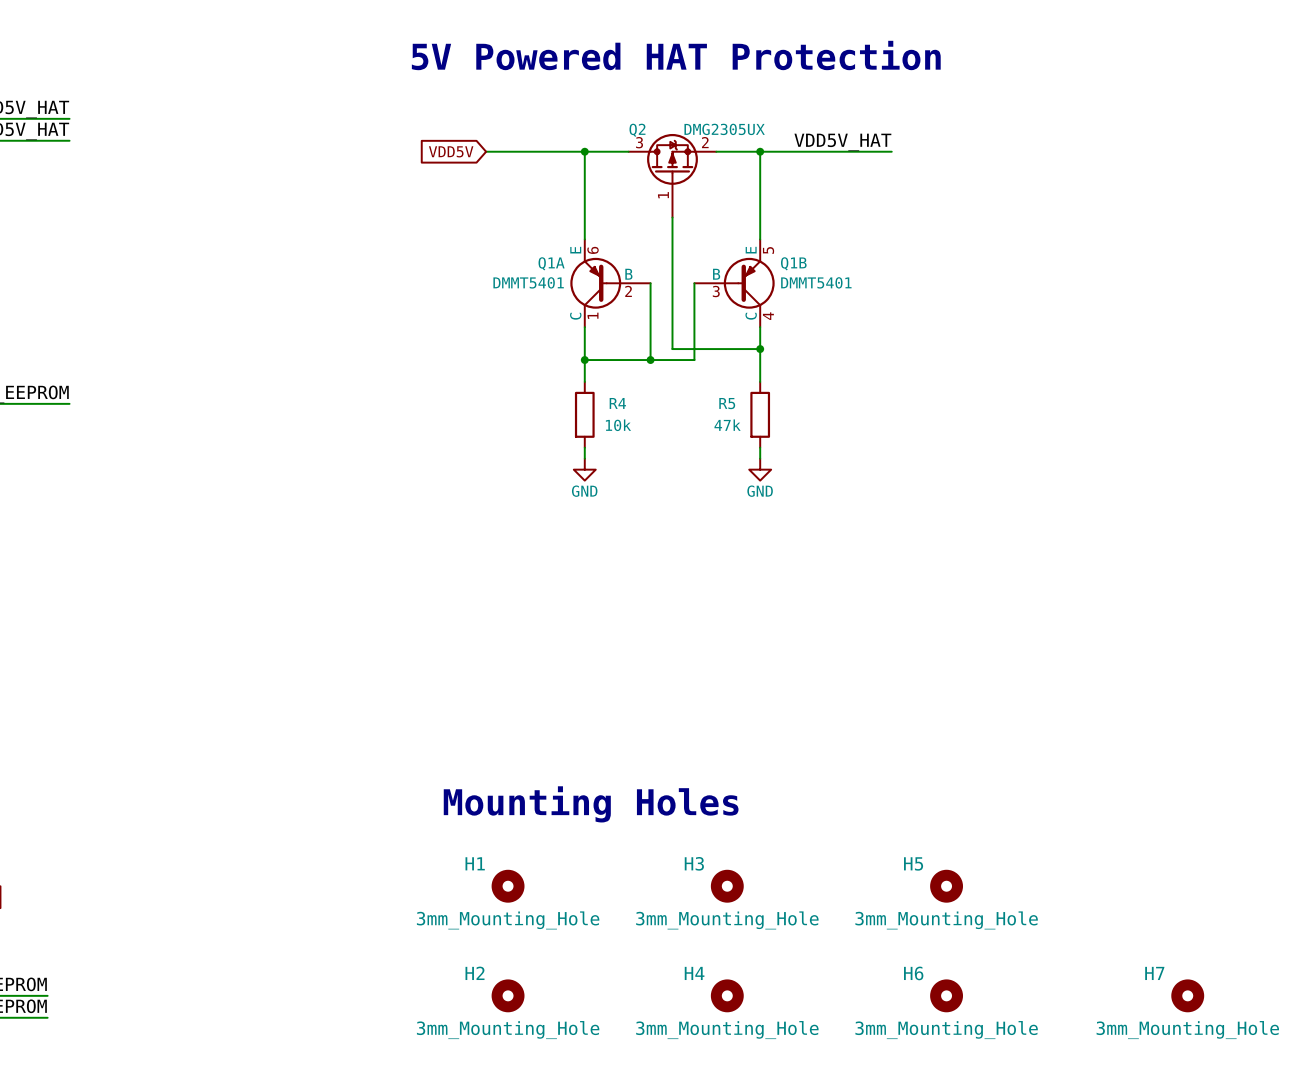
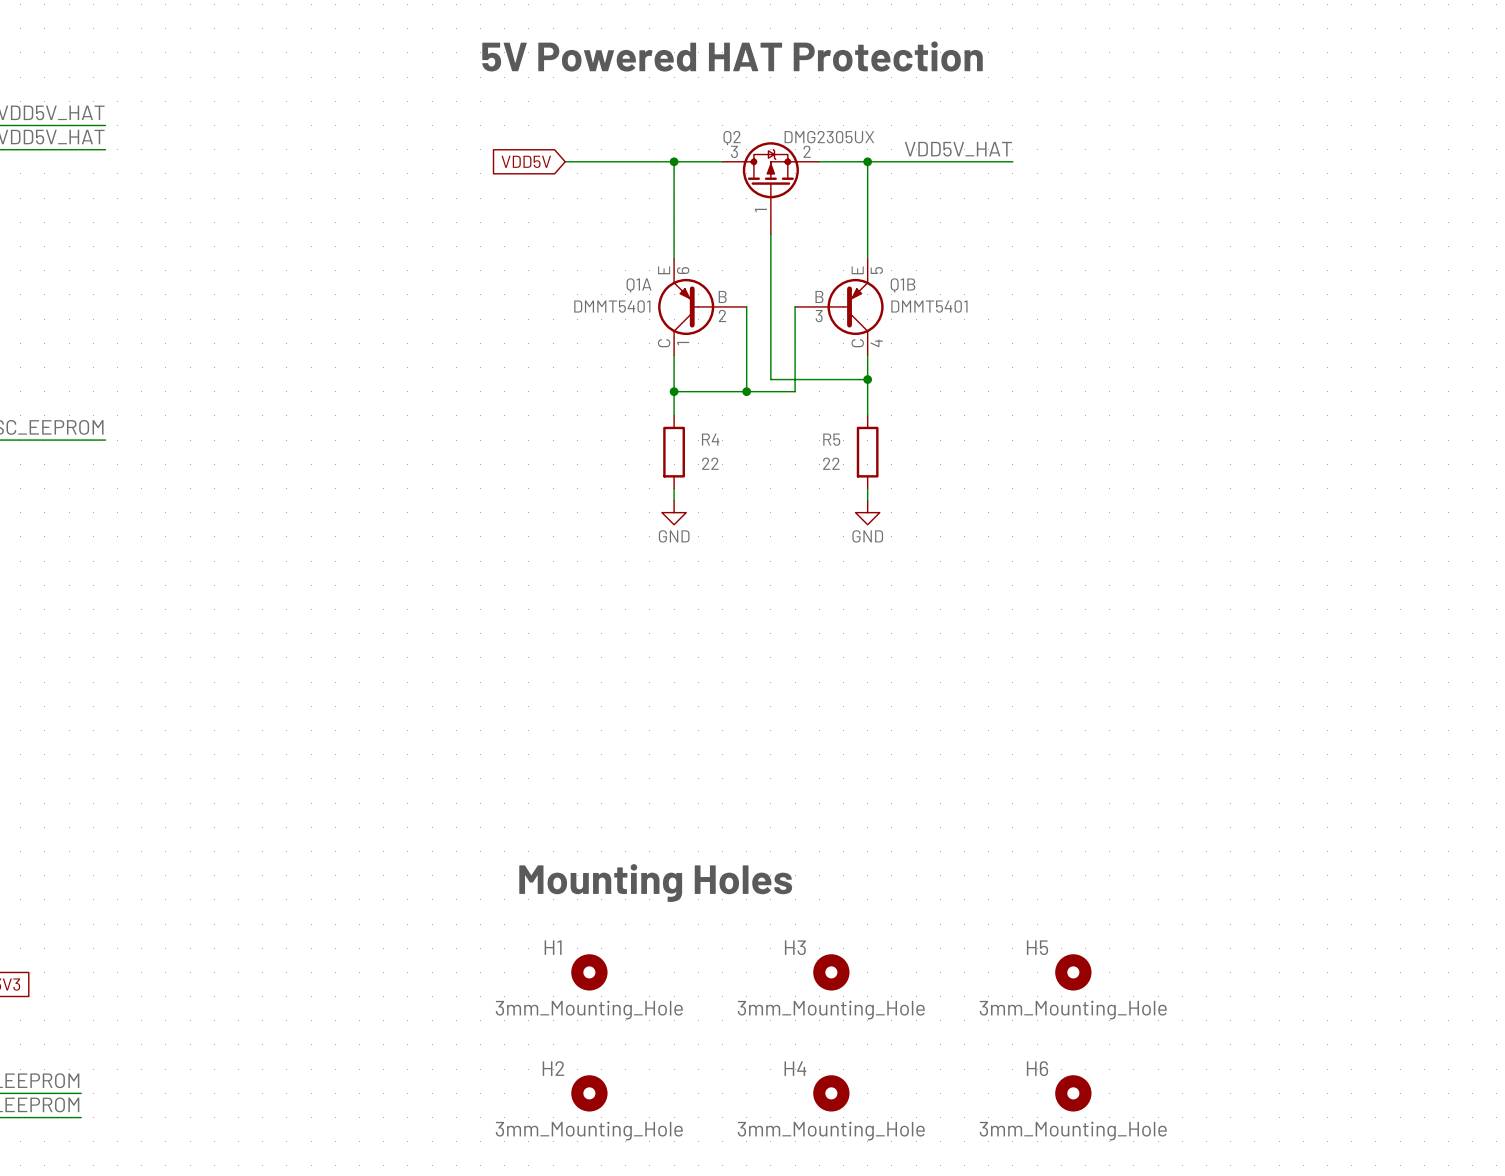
R4 value: 10k (618, 425) -> 22 (710, 463)
R5 value: 47k (727, 425) -> 22 (831, 463)
H7: 3mm_Mounting_Hole (1187, 995) -> none

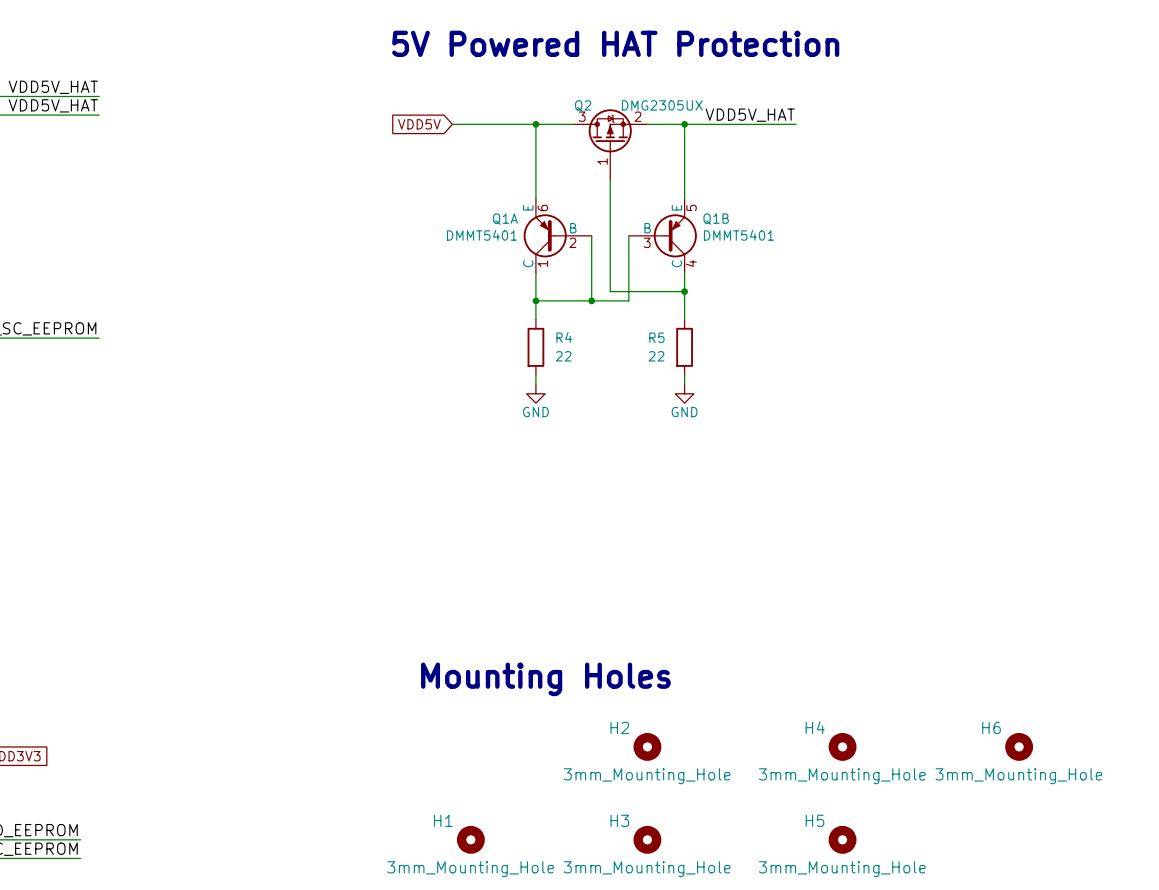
H5 name: H5 (1037, 947) -> H4 (815, 727)
H1: 3mm_Mounting_Hole (589, 972) -> none
H2: none -> 3mm_Mounting_Hole (647, 746)
H3 position: (831, 972) -> (647, 839)
H6: none -> 3mm_Mounting_Hole (1019, 746)
H2 name: H2 (553, 1068) -> H1 (443, 820)
H6 name: H6 (1037, 1068) -> H5 (814, 820)
H4: 3mm_Mounting_Hole (831, 1093) -> none

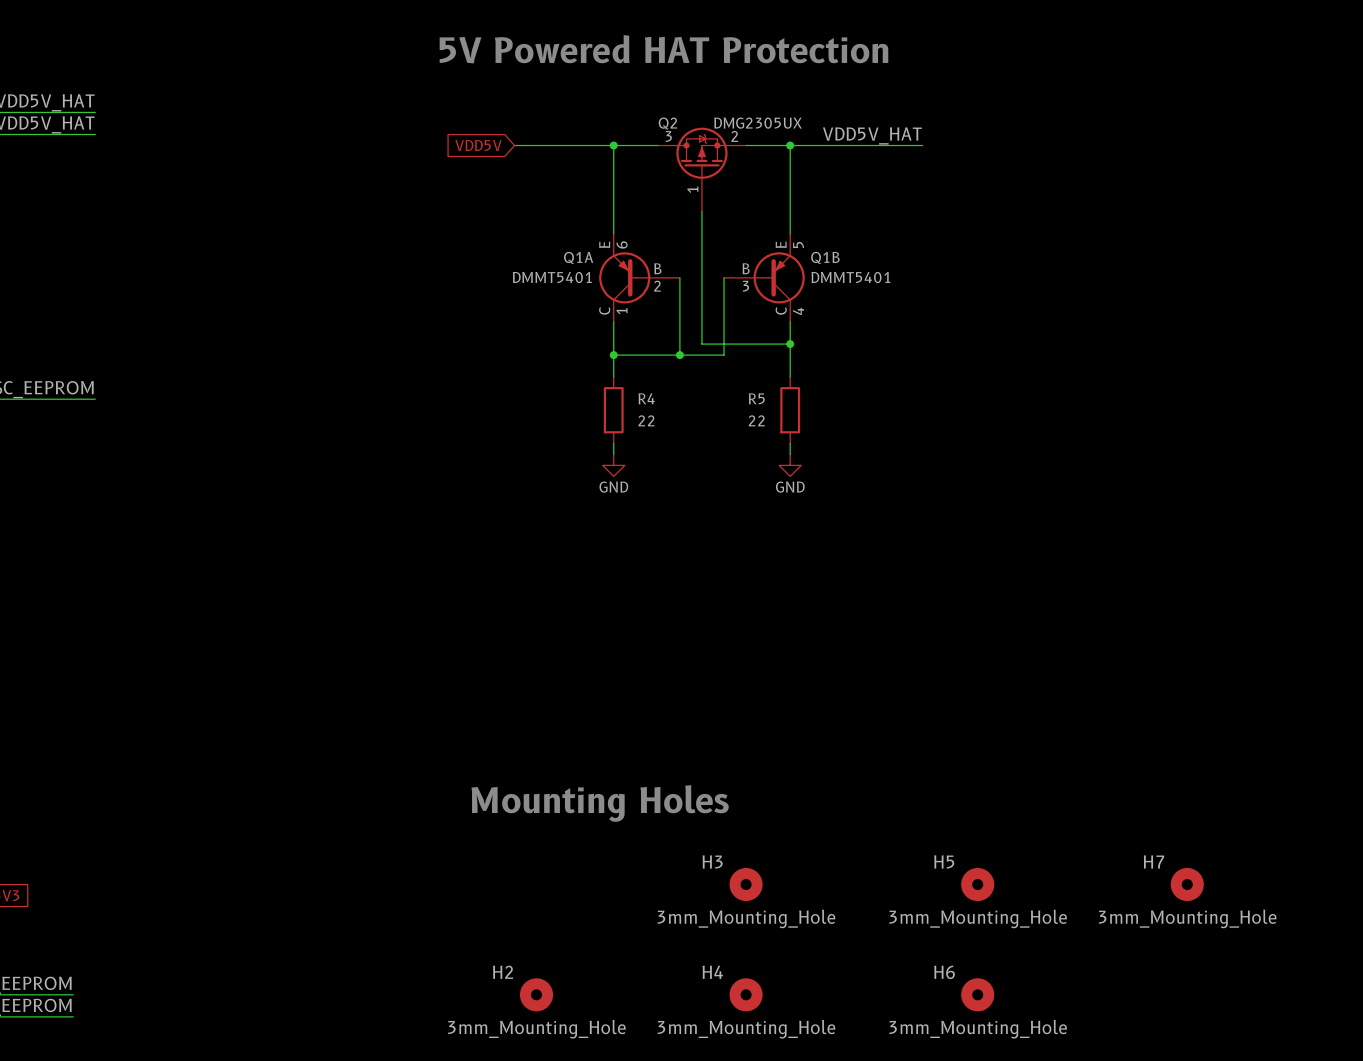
H2 name: H2 (619, 727) -> H3 (712, 861)
H4 name: H4 (815, 727) -> H5 (944, 861)
H6 name: H6 (991, 727) -> H7 (1153, 861)
H1 name: H1 (443, 820) -> H2 (503, 972)
H3 name: H3 (619, 820) -> H4 (712, 972)
H5 name: H5 (814, 820) -> H6 (944, 972)

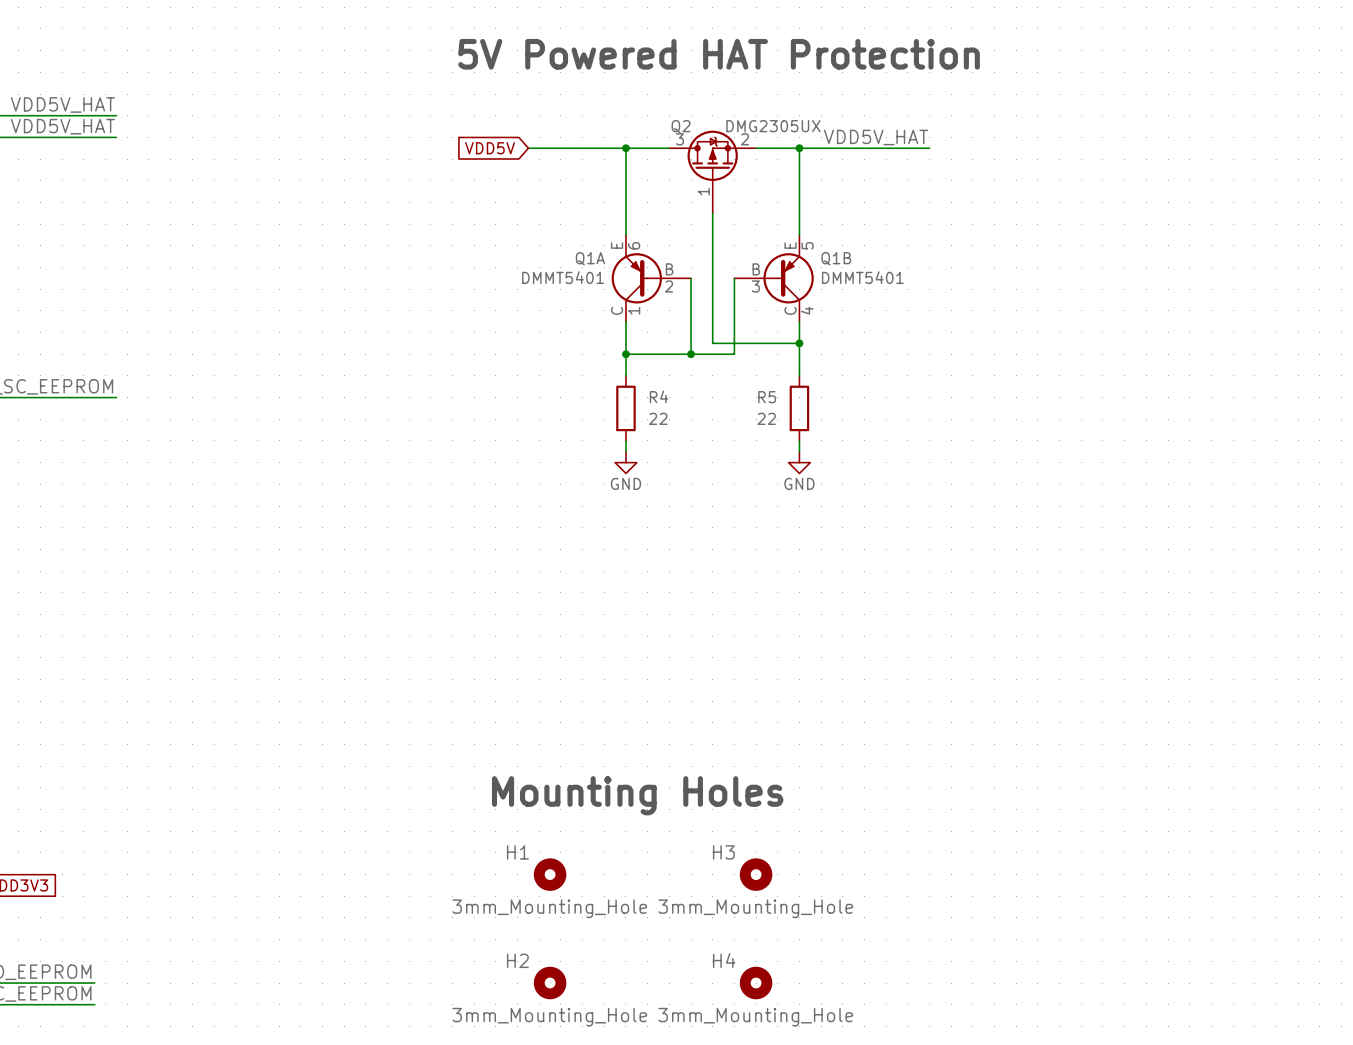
H1: none -> 3mm_Mounting_Hole (550, 874)
H5: 3mm_Mounting_Hole (977, 884) -> none
H7: 3mm_Mounting_Hole (1187, 884) -> none
H6: 3mm_Mounting_Hole (977, 994) -> none

